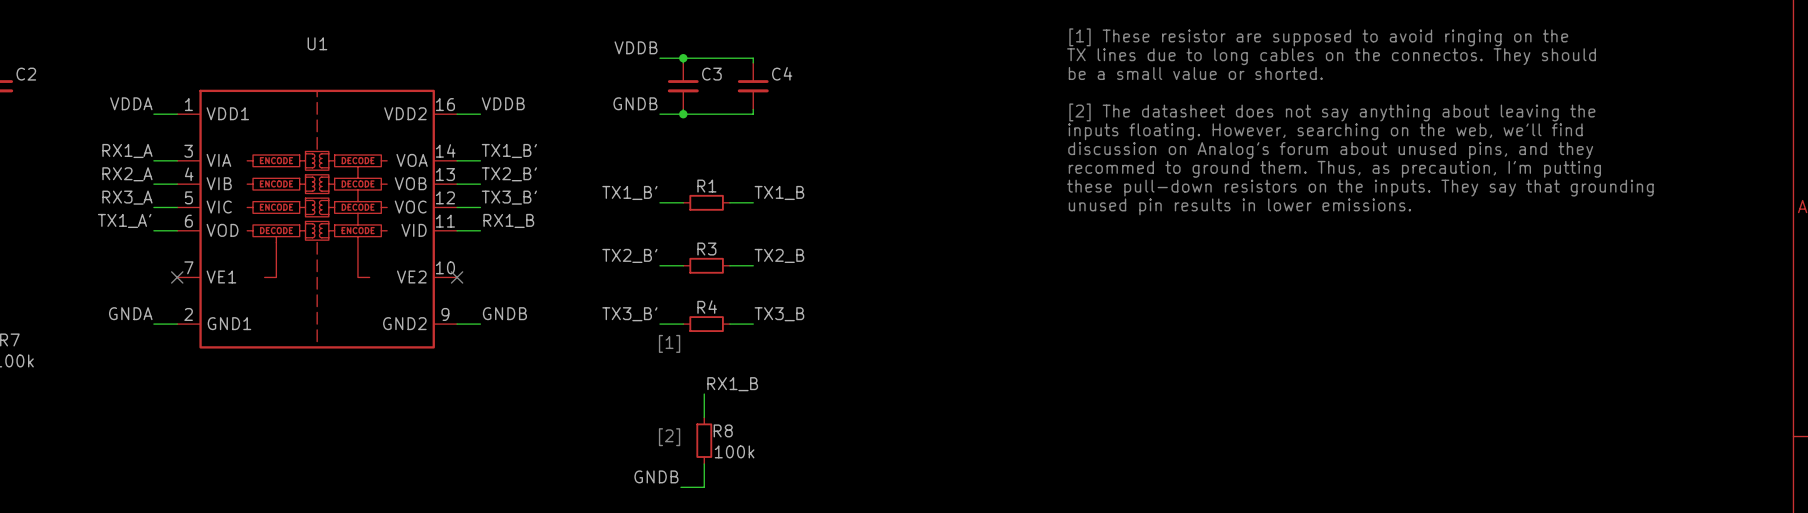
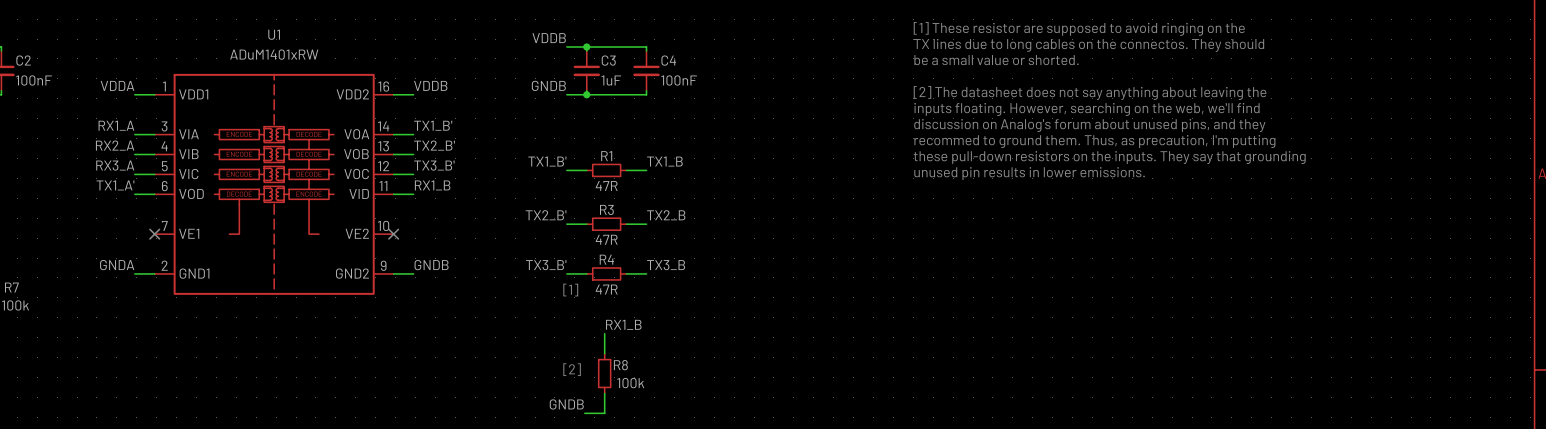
U1 value: none -> ADuM1401xRW (274, 54)
C2 value: none -> 100nF (34, 80)
C3 value: none -> 1uF (611, 80)
C4 value: none -> 100nF (679, 80)
R1 value: none -> 47R (606, 185)
R3 value: none -> 47R (606, 239)
R4 value: none -> 47R (606, 289)

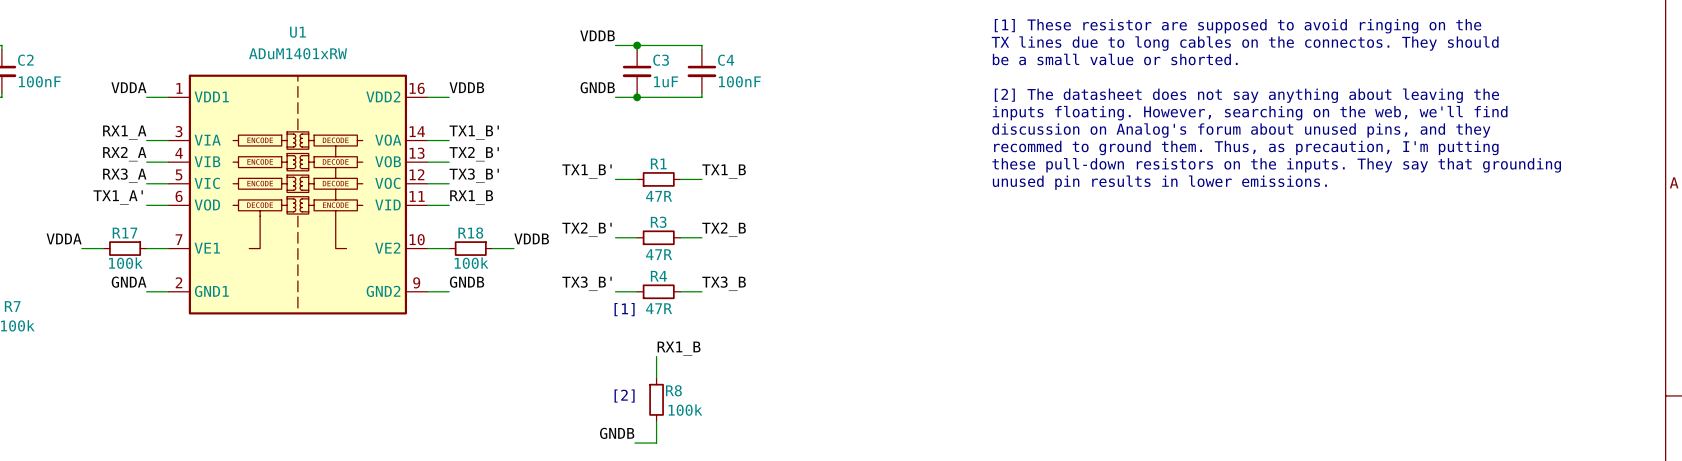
label: none -> VDDA (64, 238)
label: none -> VDDB (531, 238)
wire: none -> (81, 248) (103, 248)
R17: none -> 100k (125, 248)
wire: none -> (146, 248) (168, 248)
no-connect mark: (154, 234) -> none
wire: none -> (427, 248) (449, 248)
no-connect mark: (393, 234) -> none
R18: none -> 100k (470, 248)
wire: none -> (492, 248) (513, 248)

